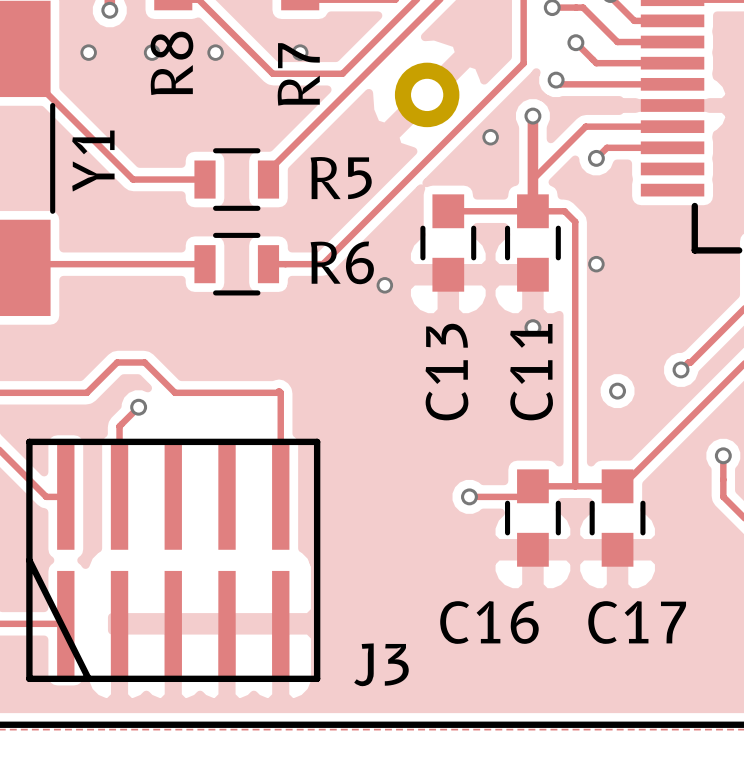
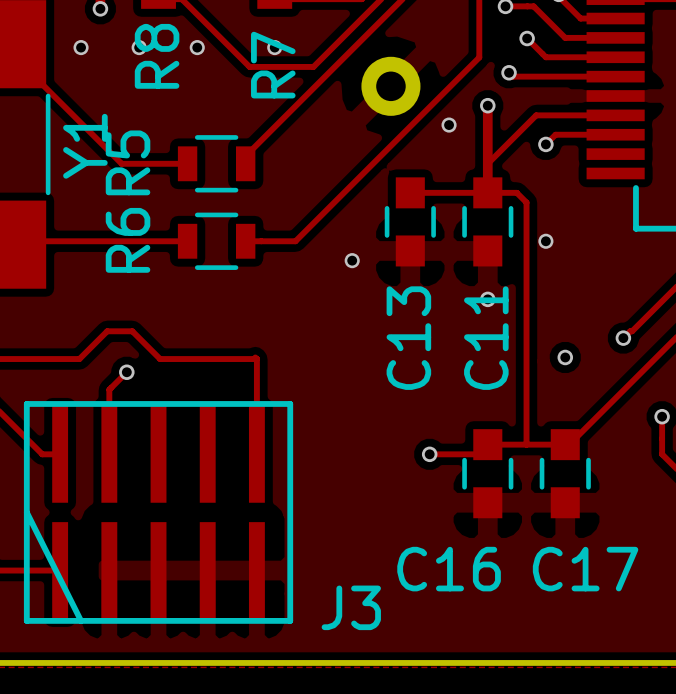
R5 name rotation: 0° (341, 178) -> 90° counterclockwise (128, 162)
R5 name position: R5 (341, 178) -> R5 (128, 162)
R6 name rotation: 0° (342, 262) -> 90° counterclockwise (128, 240)
R6 name position: R6 (342, 262) -> R6 (128, 240)

